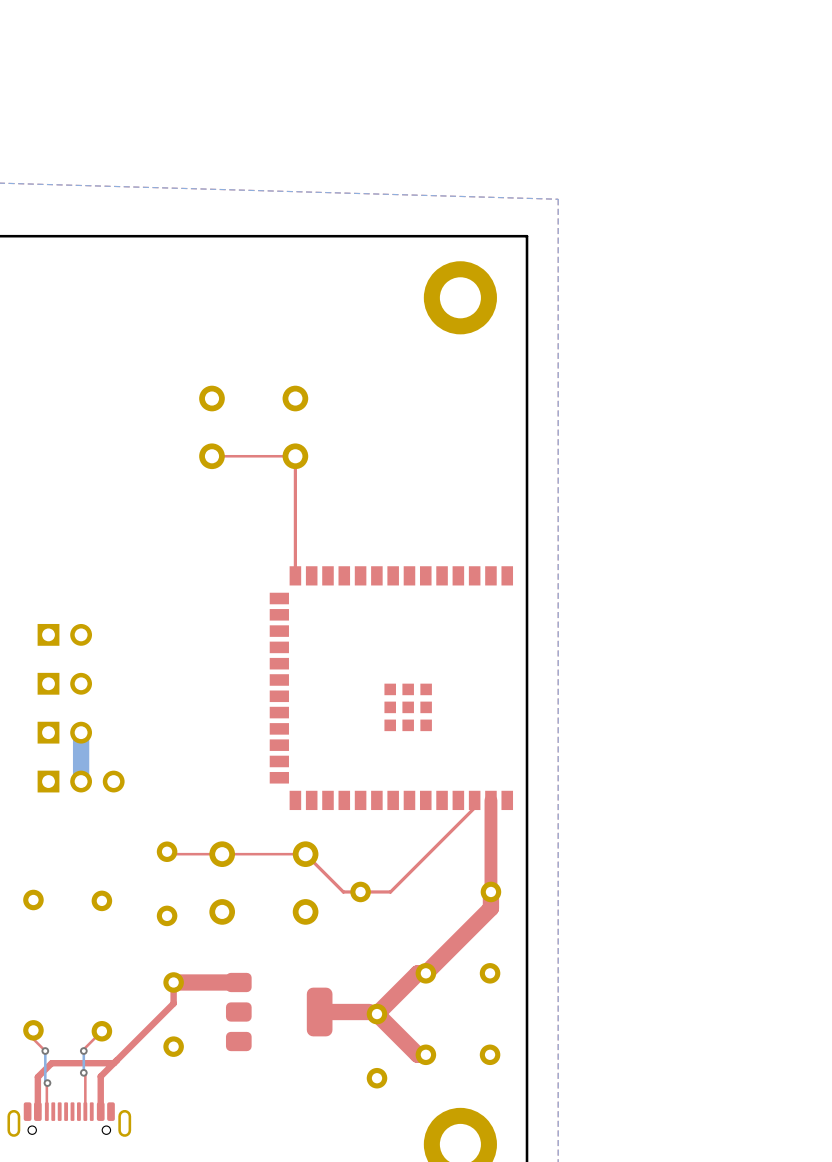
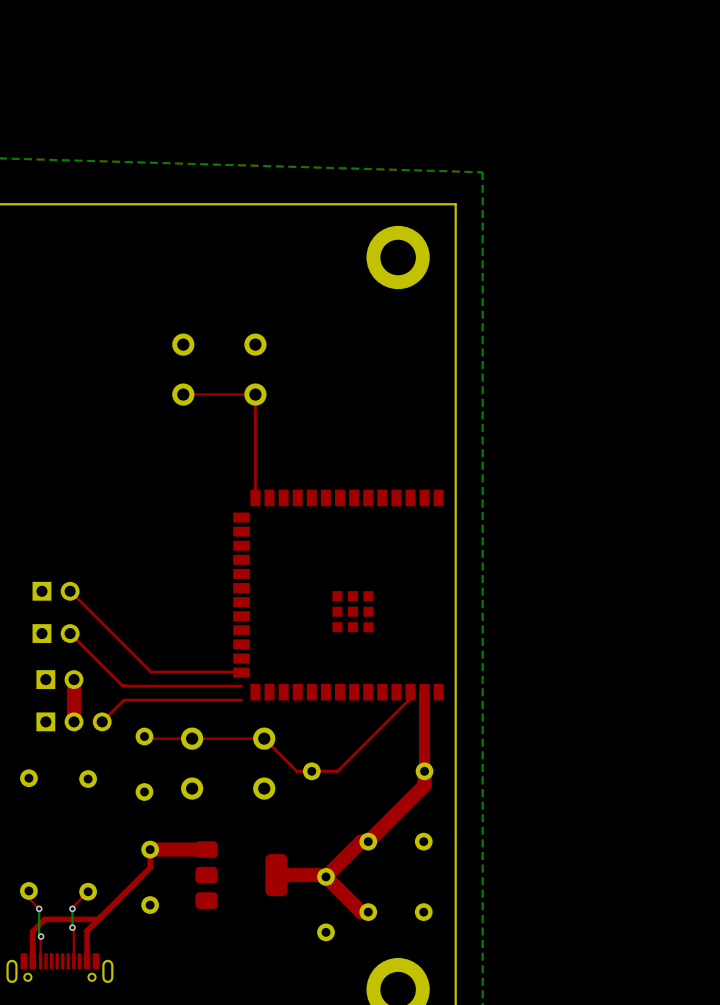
part: (64, 634) -> none
top track: none -> (74, 595) (150, 671) (241, 671)
bottom track: (81, 732) (81, 781) -> none
top track: none -> (74, 637) (122, 685) (241, 686)
part footprint: [37, 770, 125, 793] -> [36, 670, 84, 690]
top track: none -> (74, 679) (74, 721)
top track: none -> (241, 700) (123, 700) (102, 721)
part: none -> (74, 721)

